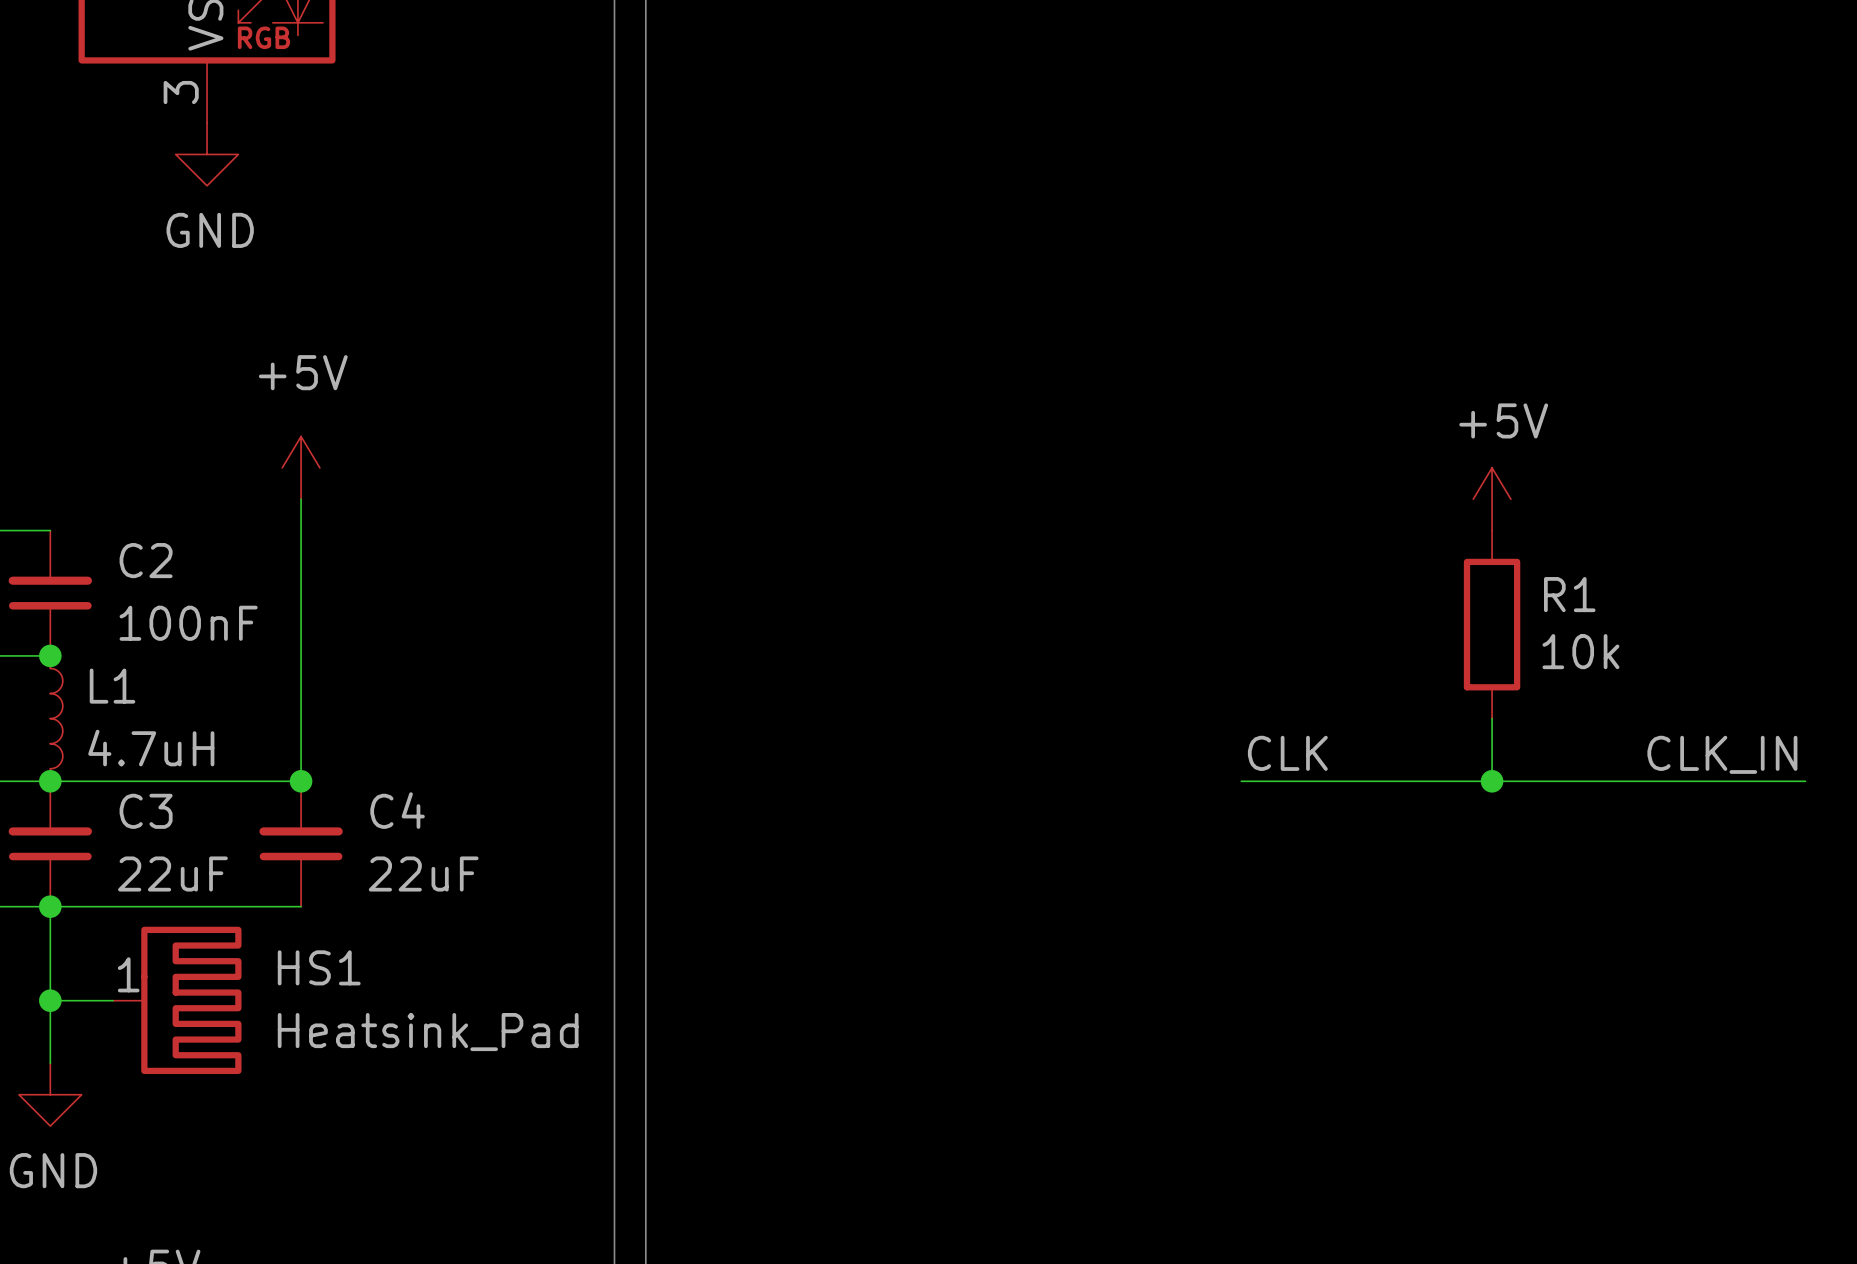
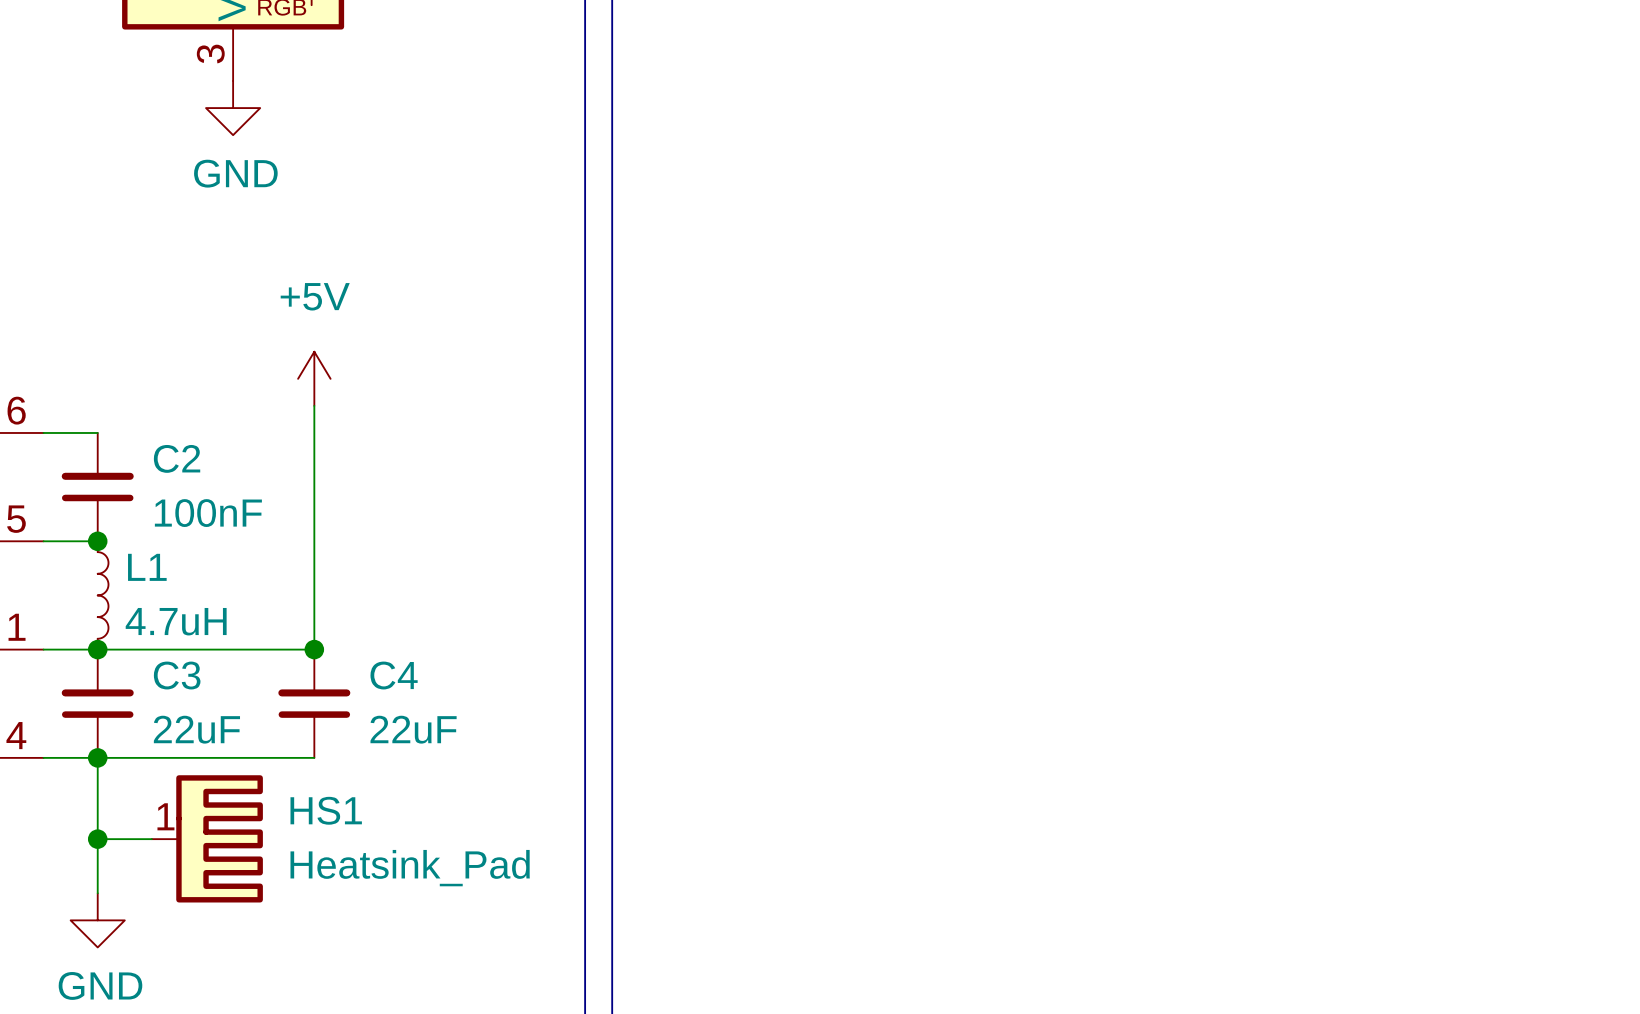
power symbol: +5V (1492, 499) -> none
R1: 10k (1492, 624) -> none
wire: (1492, 718) (1492, 781) -> none
label: CLK (1287, 753) -> none
label: CLK_IN (1722, 754) -> none
wire: (1241, 781) (1805, 781) -> none
junction: (1492, 781) -> none

